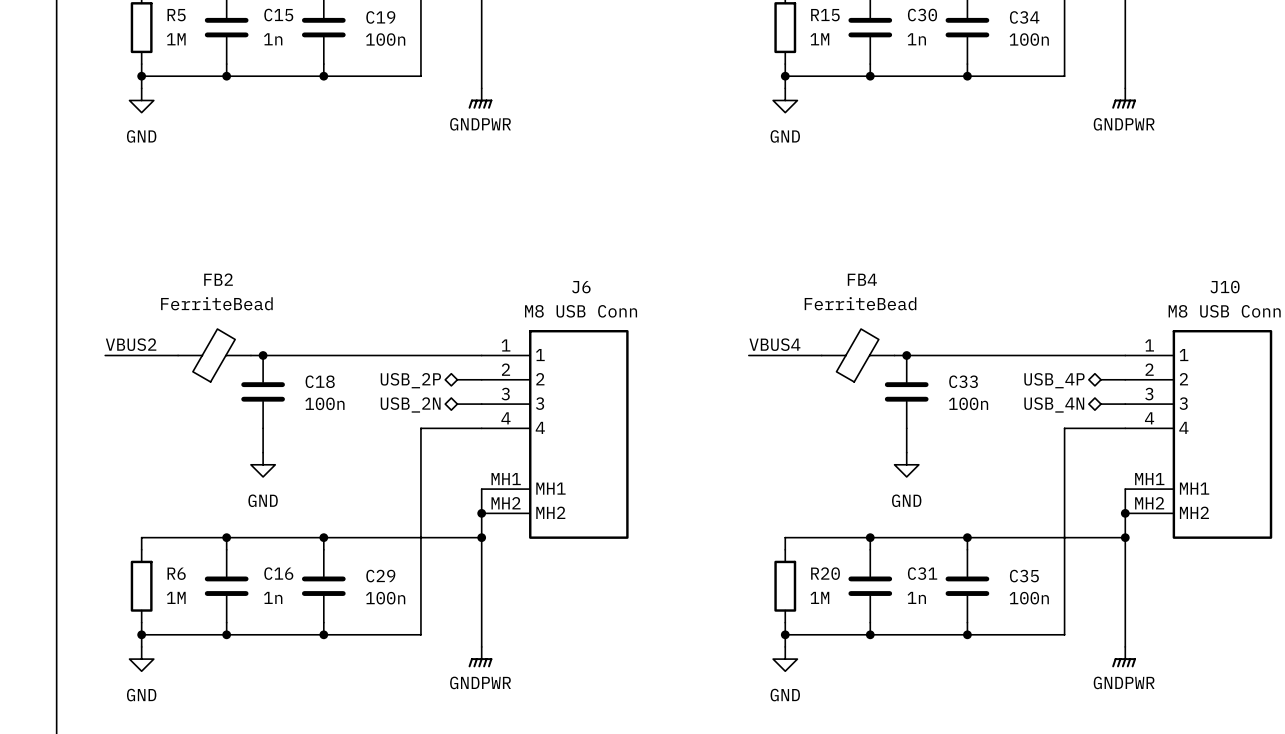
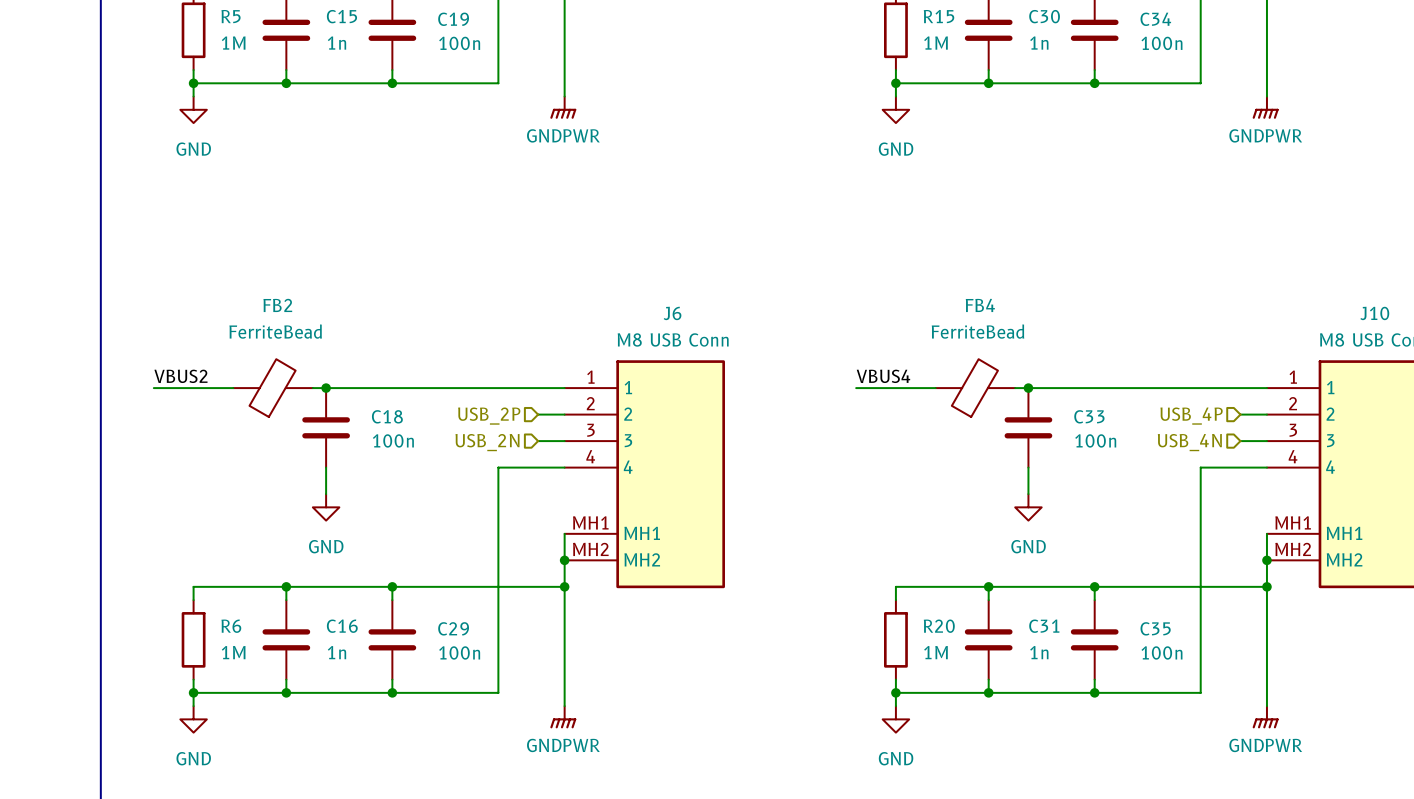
hierarchical label shape: bidirectional (410, 380) -> input (489, 416)
hierarchical label shape: bidirectional (1054, 380) -> input (1191, 416)
hierarchical label shape: bidirectional (410, 404) -> input (487, 442)
hierarchical label shape: bidirectional (1054, 404) -> input (1189, 442)

